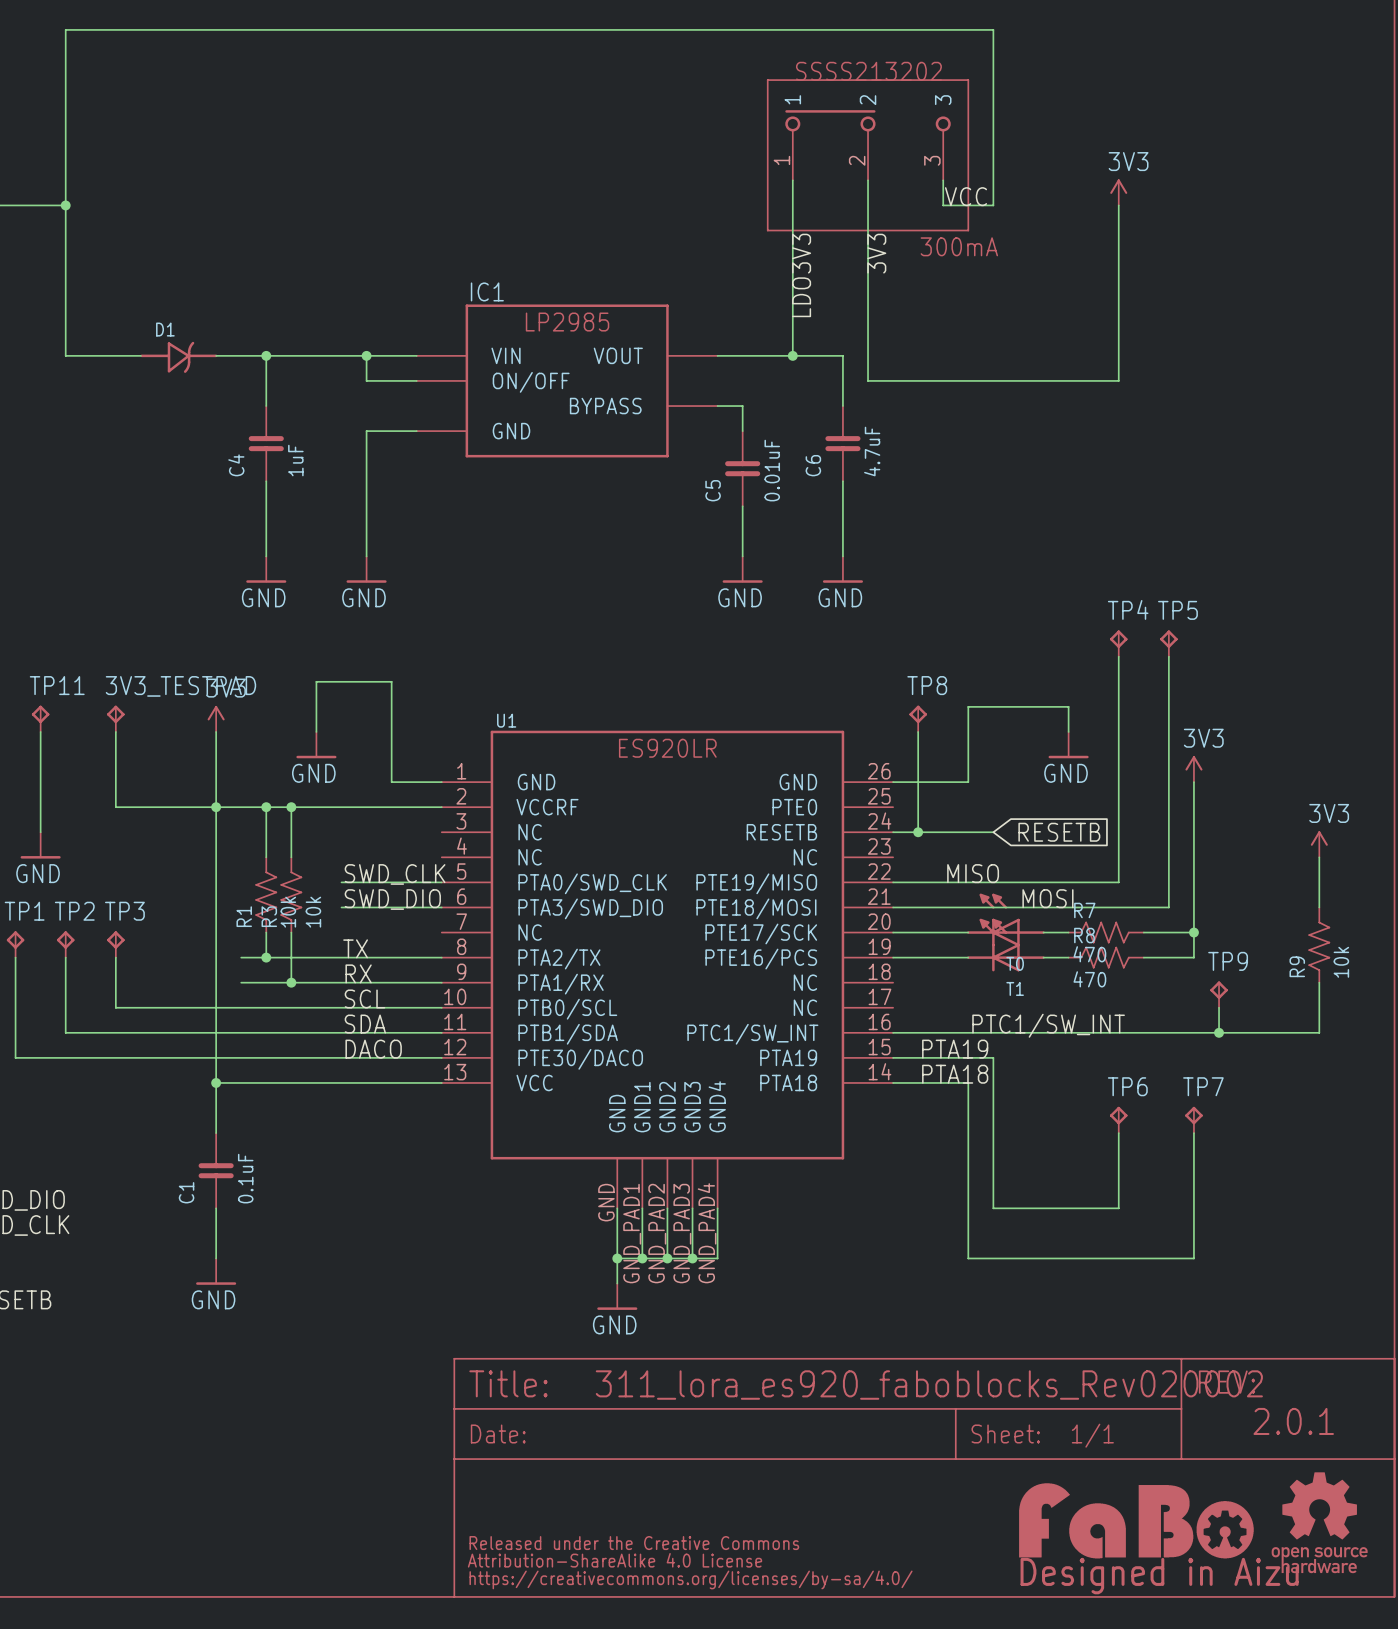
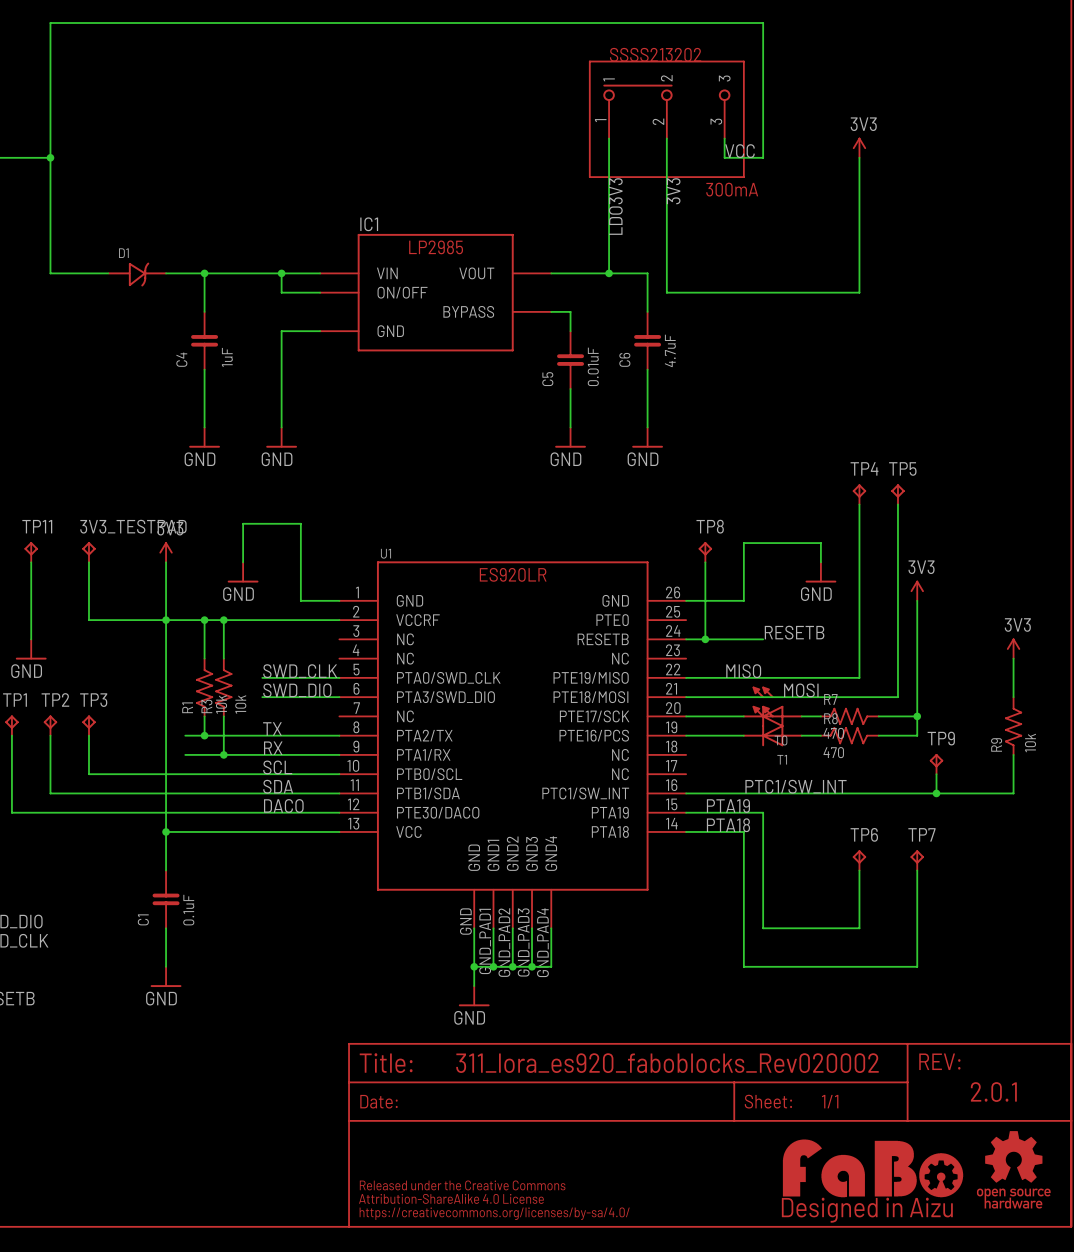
label: none -> RESETB (794, 632)
global label: RESETB (1059, 832) -> none

